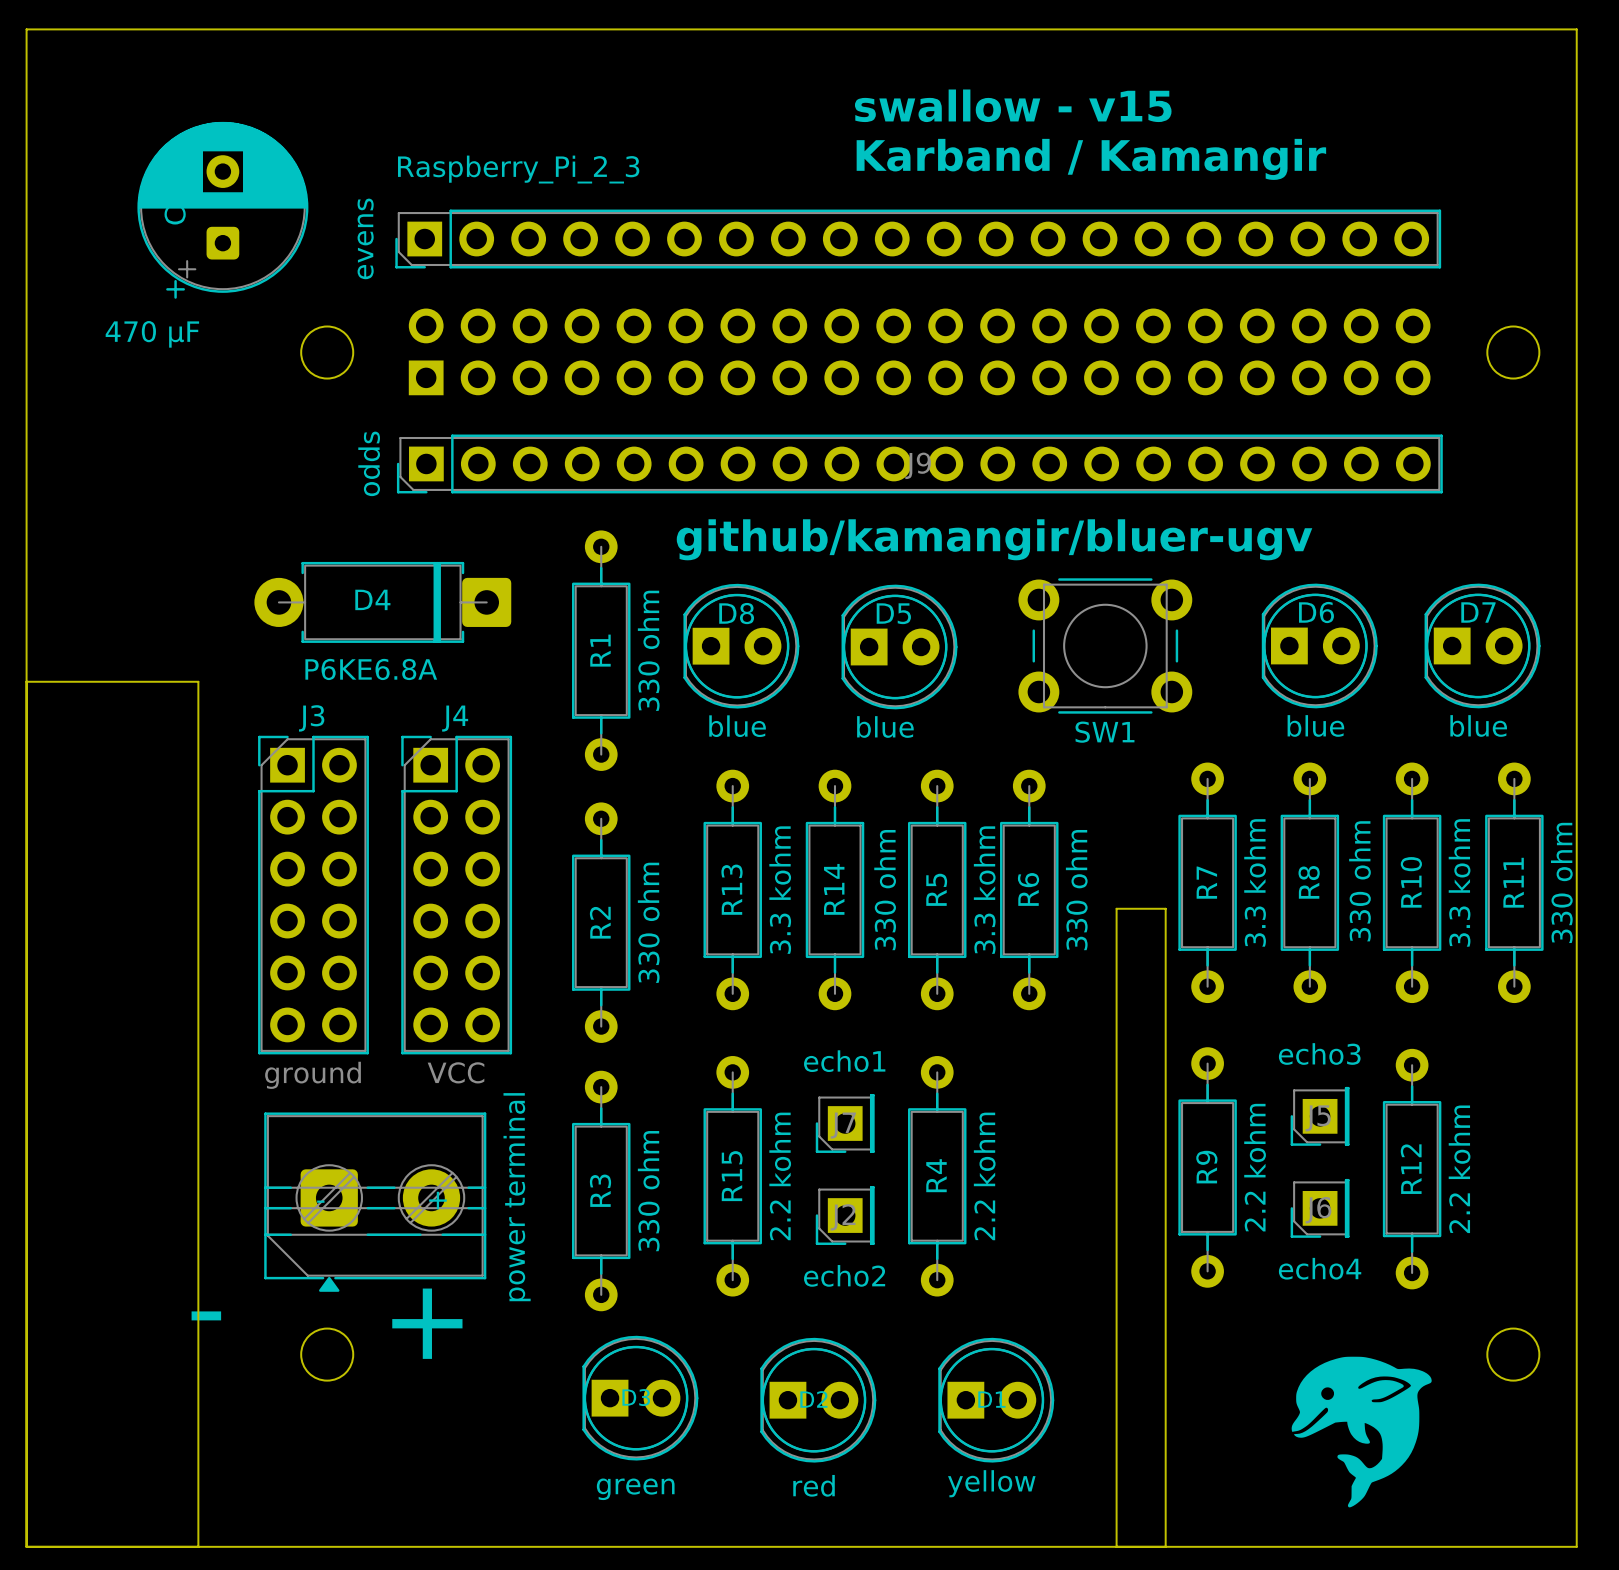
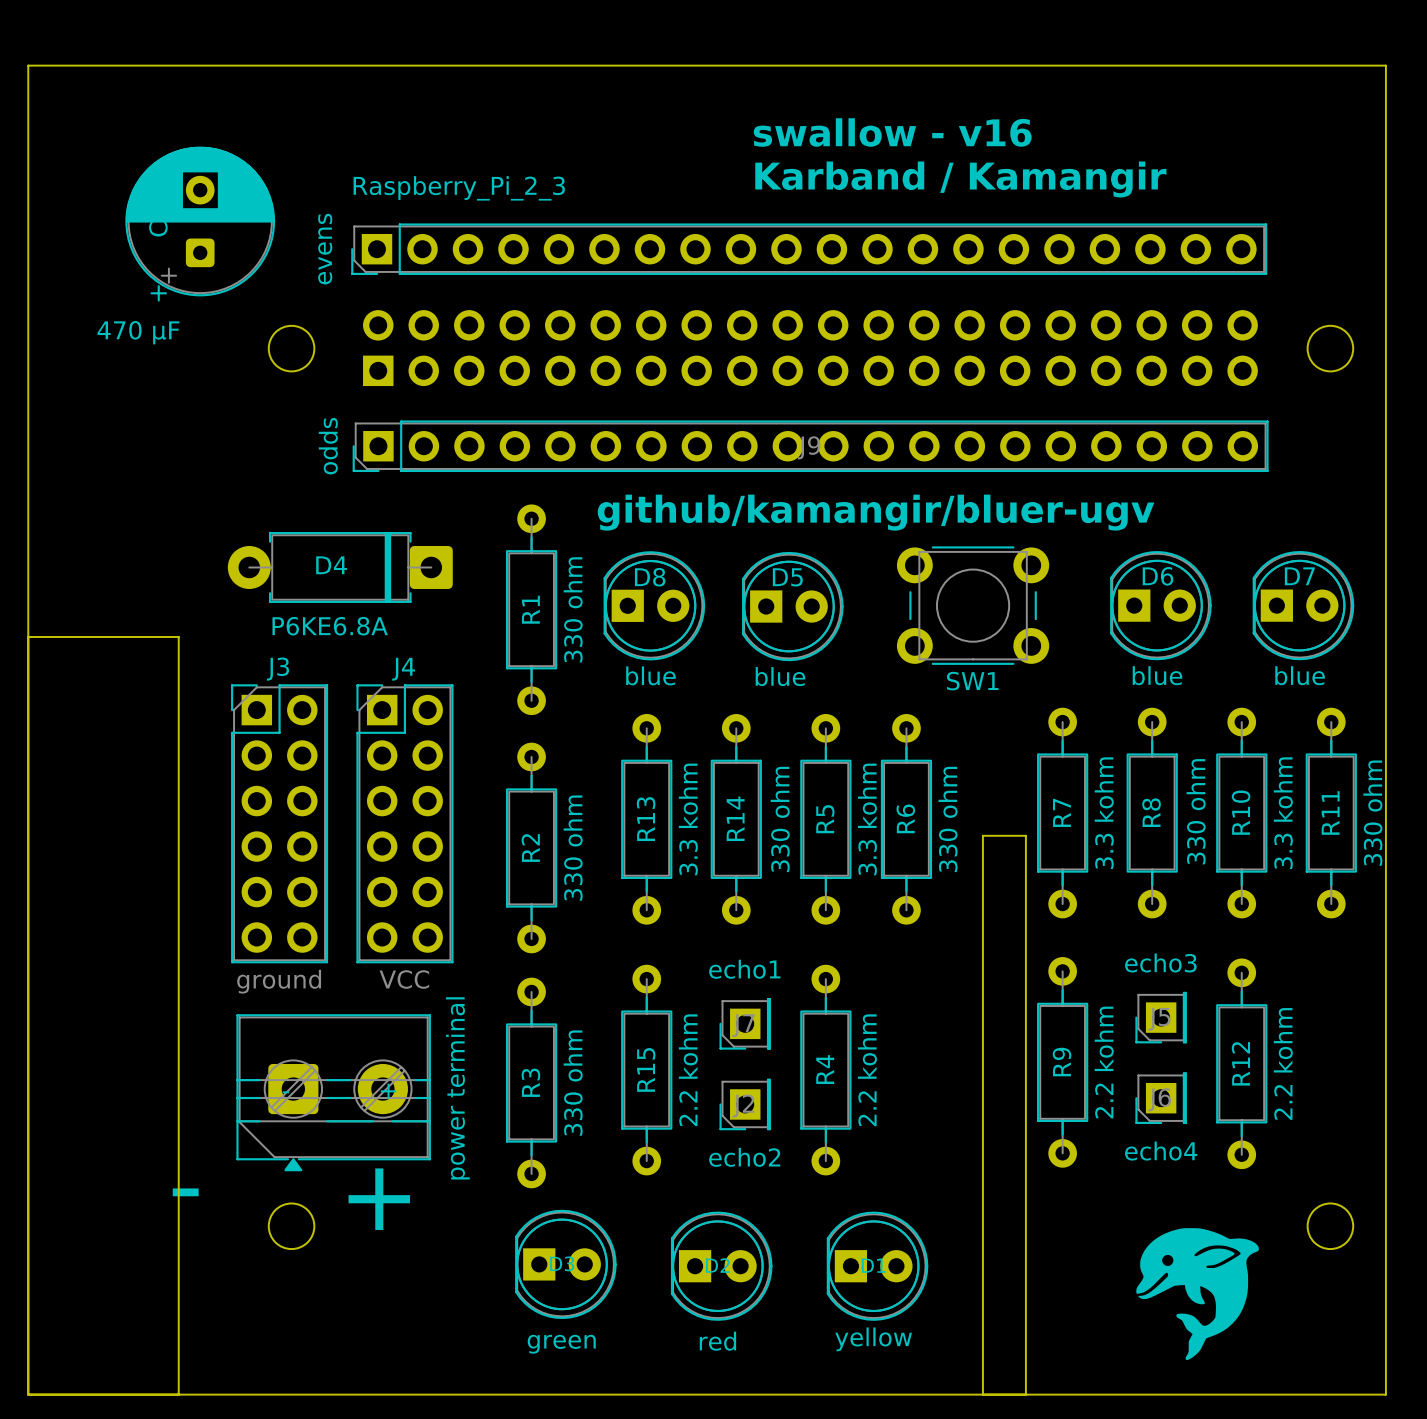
text: swallow - v15 (1013, 105) -> swallow - v16 (892, 132)

